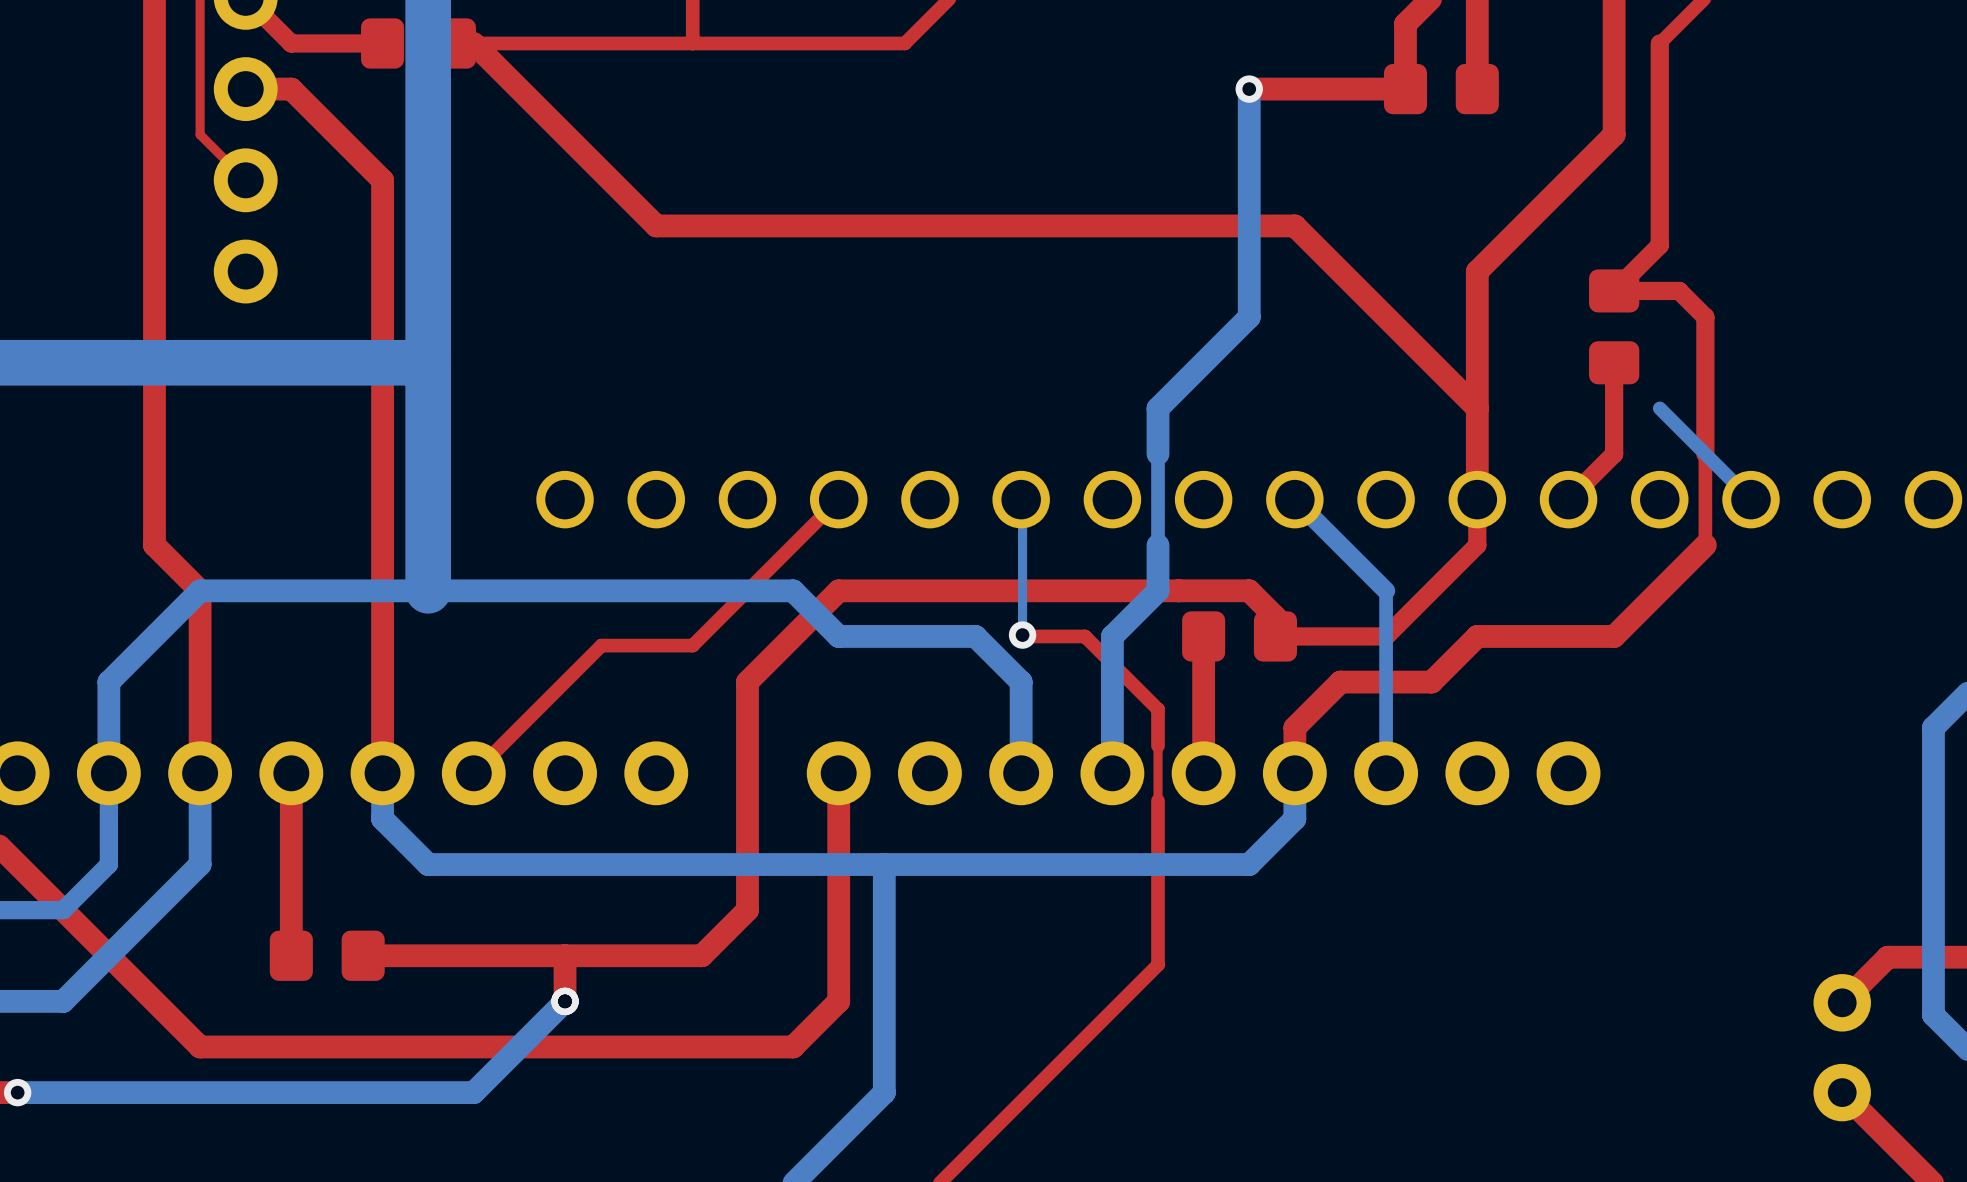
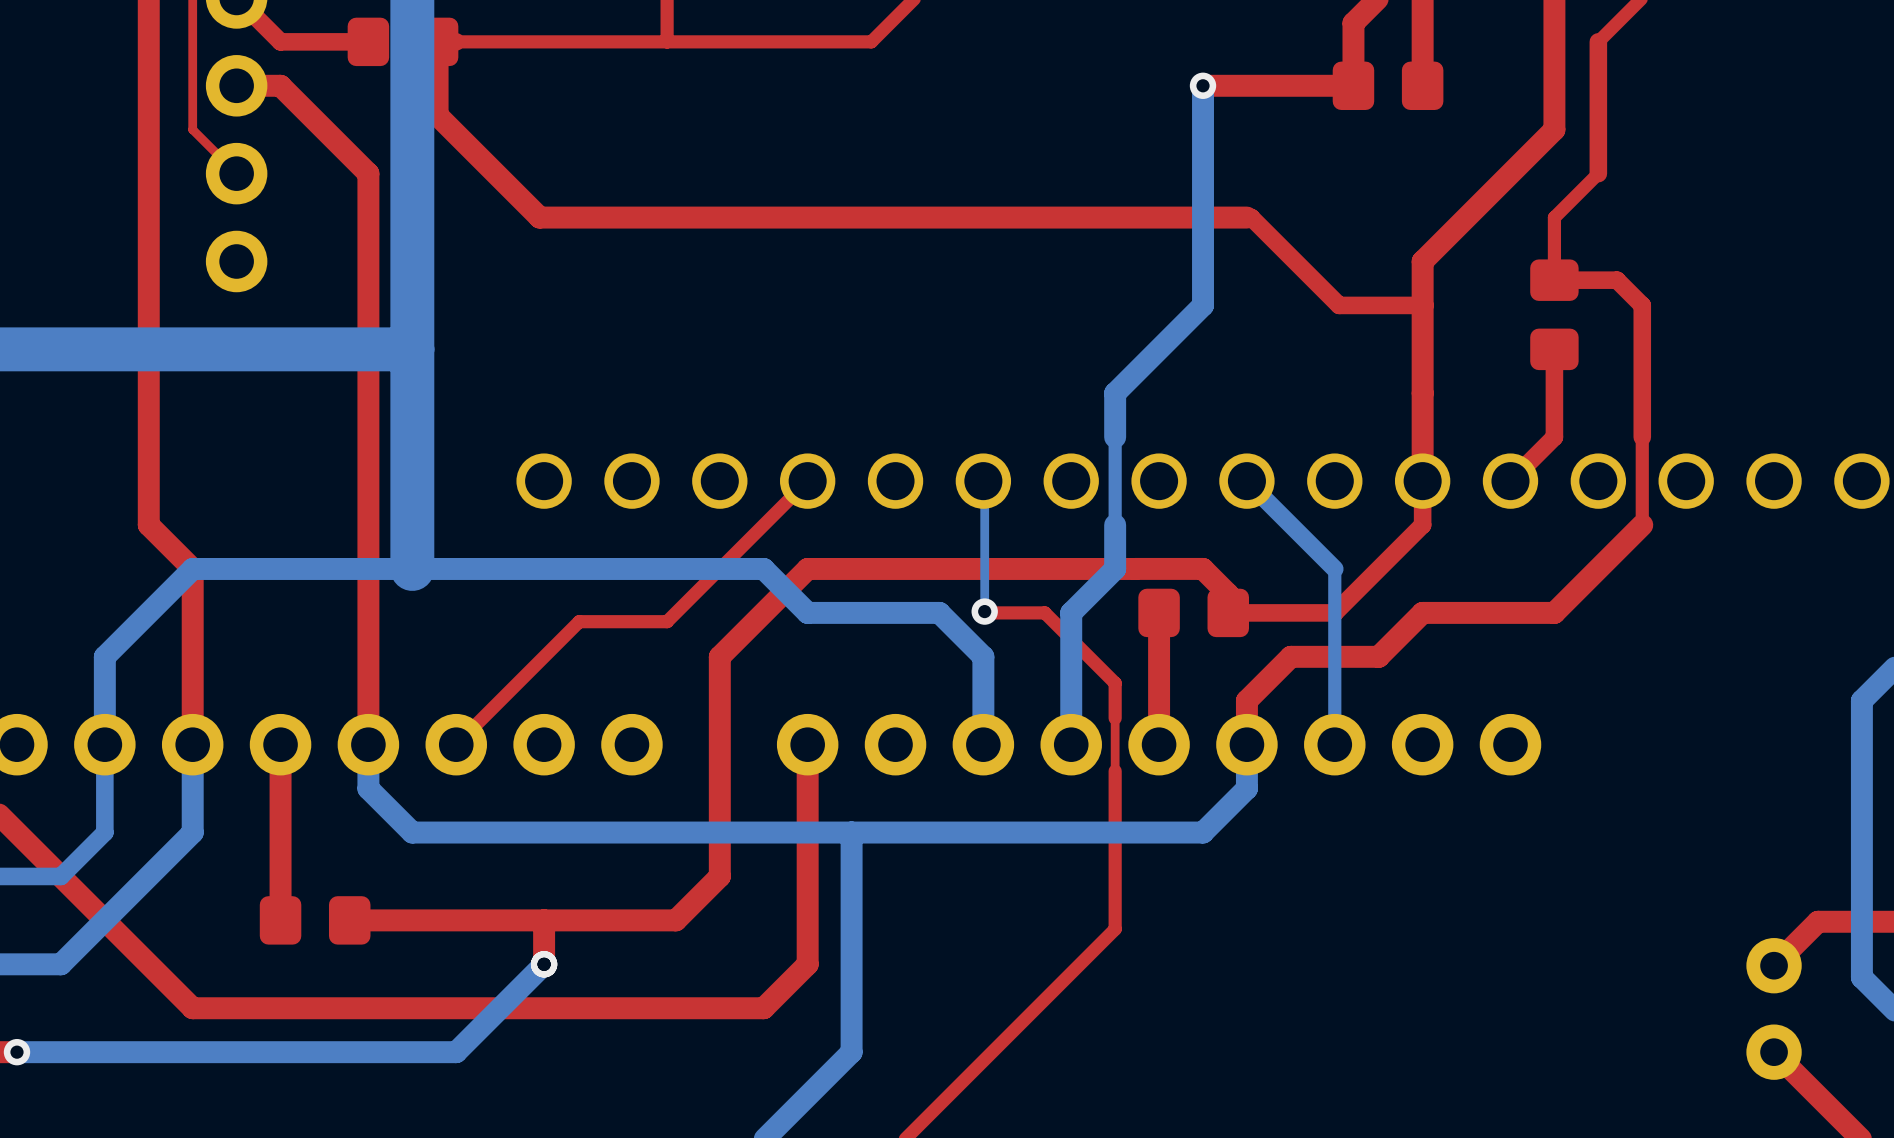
top track: (473, 43) (656, 225) -> (437, 41) (437, 115) (539, 217) (631, 217)
top track: (1659, 180) (1659, 245) (1614, 290) -> (1598, 173) (1554, 217) (1554, 280)
top track: (1294, 225) (1477, 408) -> (1246, 217) (1251, 217) (1339, 305) (1422, 305)
bottom track: (1659, 408) (1751, 499) -> none

